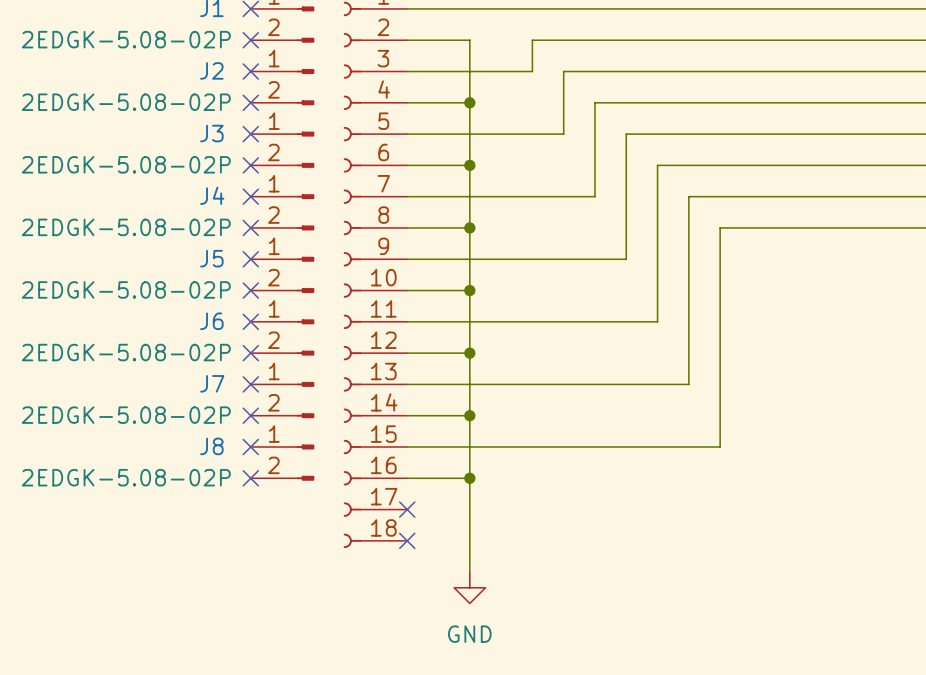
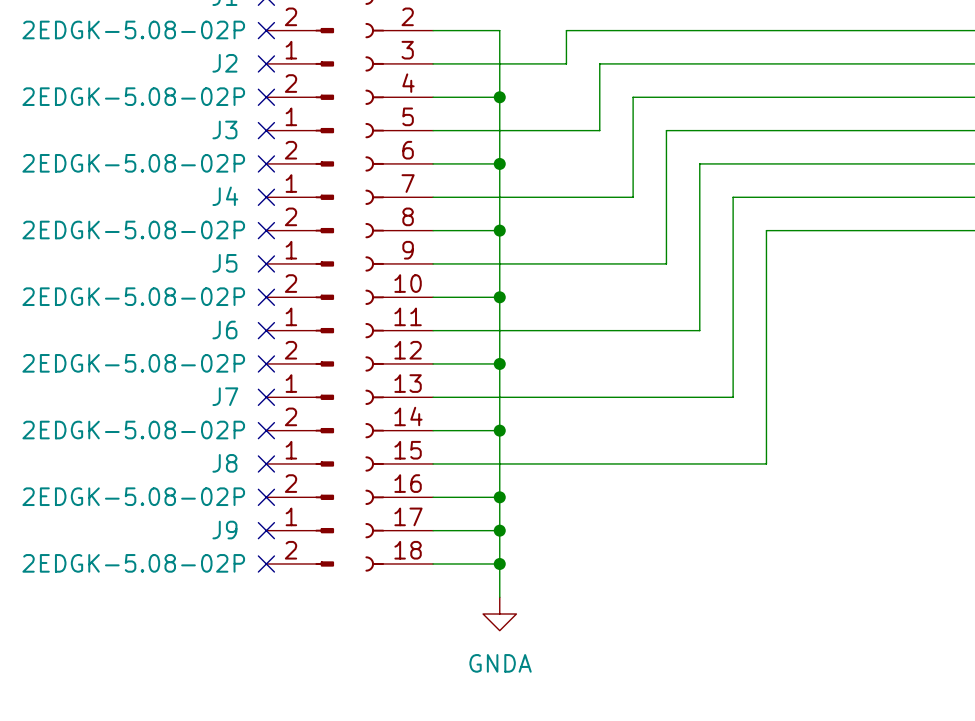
no-connect mark: none -> (266, 530)
wire: none -> (433, 530) (499, 530)
no-connect mark: (407, 509) -> none
junction: none -> (499, 530)
J9: none -> 2EDGK-5.08-02P (300, 547)
no-connect mark: none -> (266, 563)
wire: none -> (433, 563) (499, 563)
no-connect mark: (407, 540) -> none
junction: none -> (499, 563)
power symbol: GND (469, 587) -> GNDA (499, 614)

